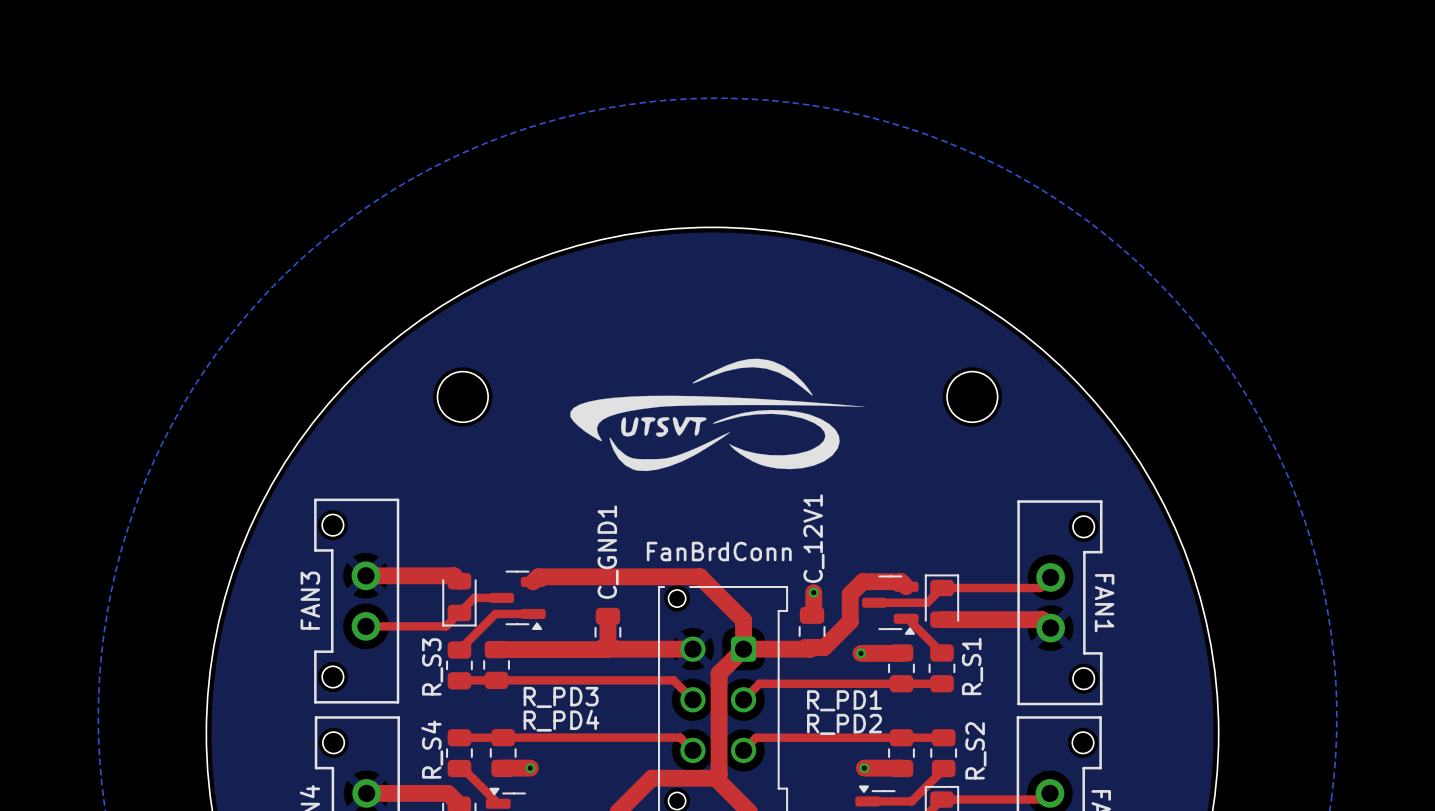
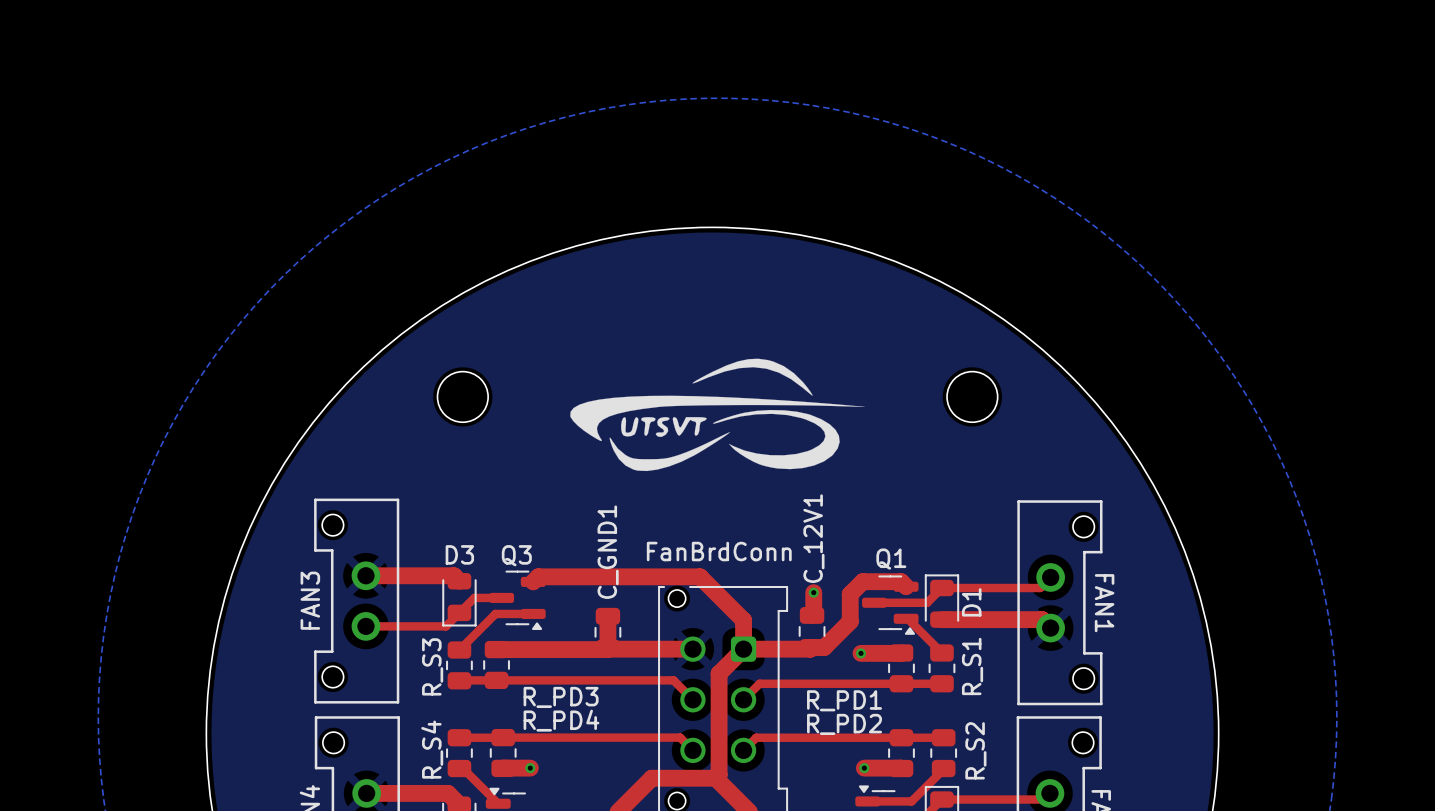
D3 name: none -> D3 (459, 554)
Q3 name: none -> Q3 (516, 555)
Q1 name: none -> Q1 (891, 559)
D1 name: none -> D1 (971, 602)

